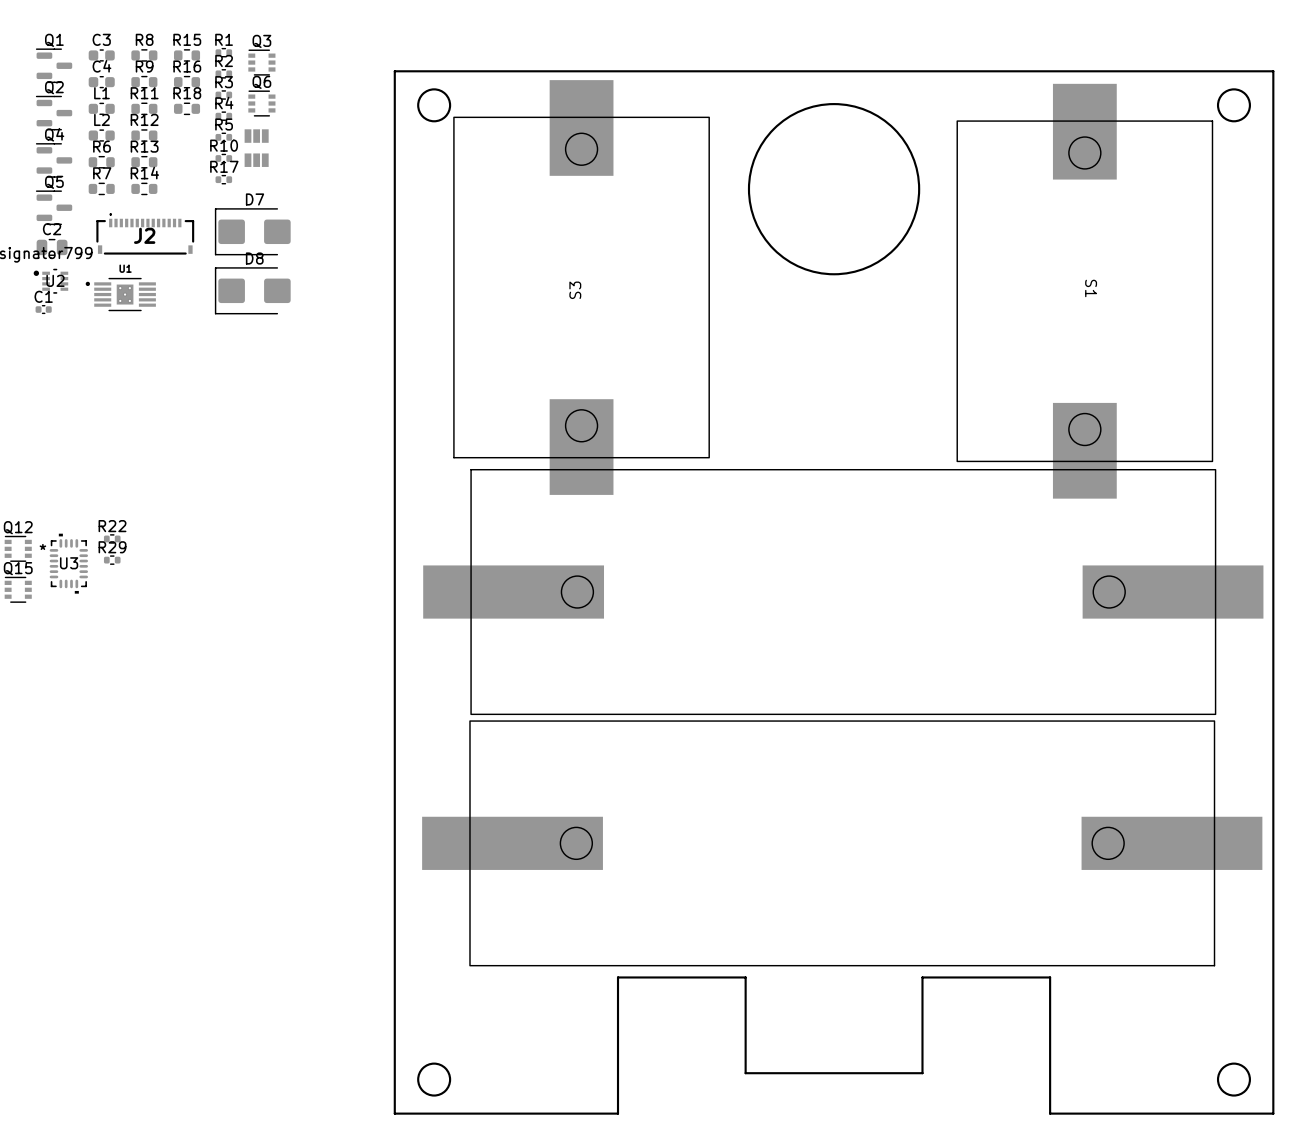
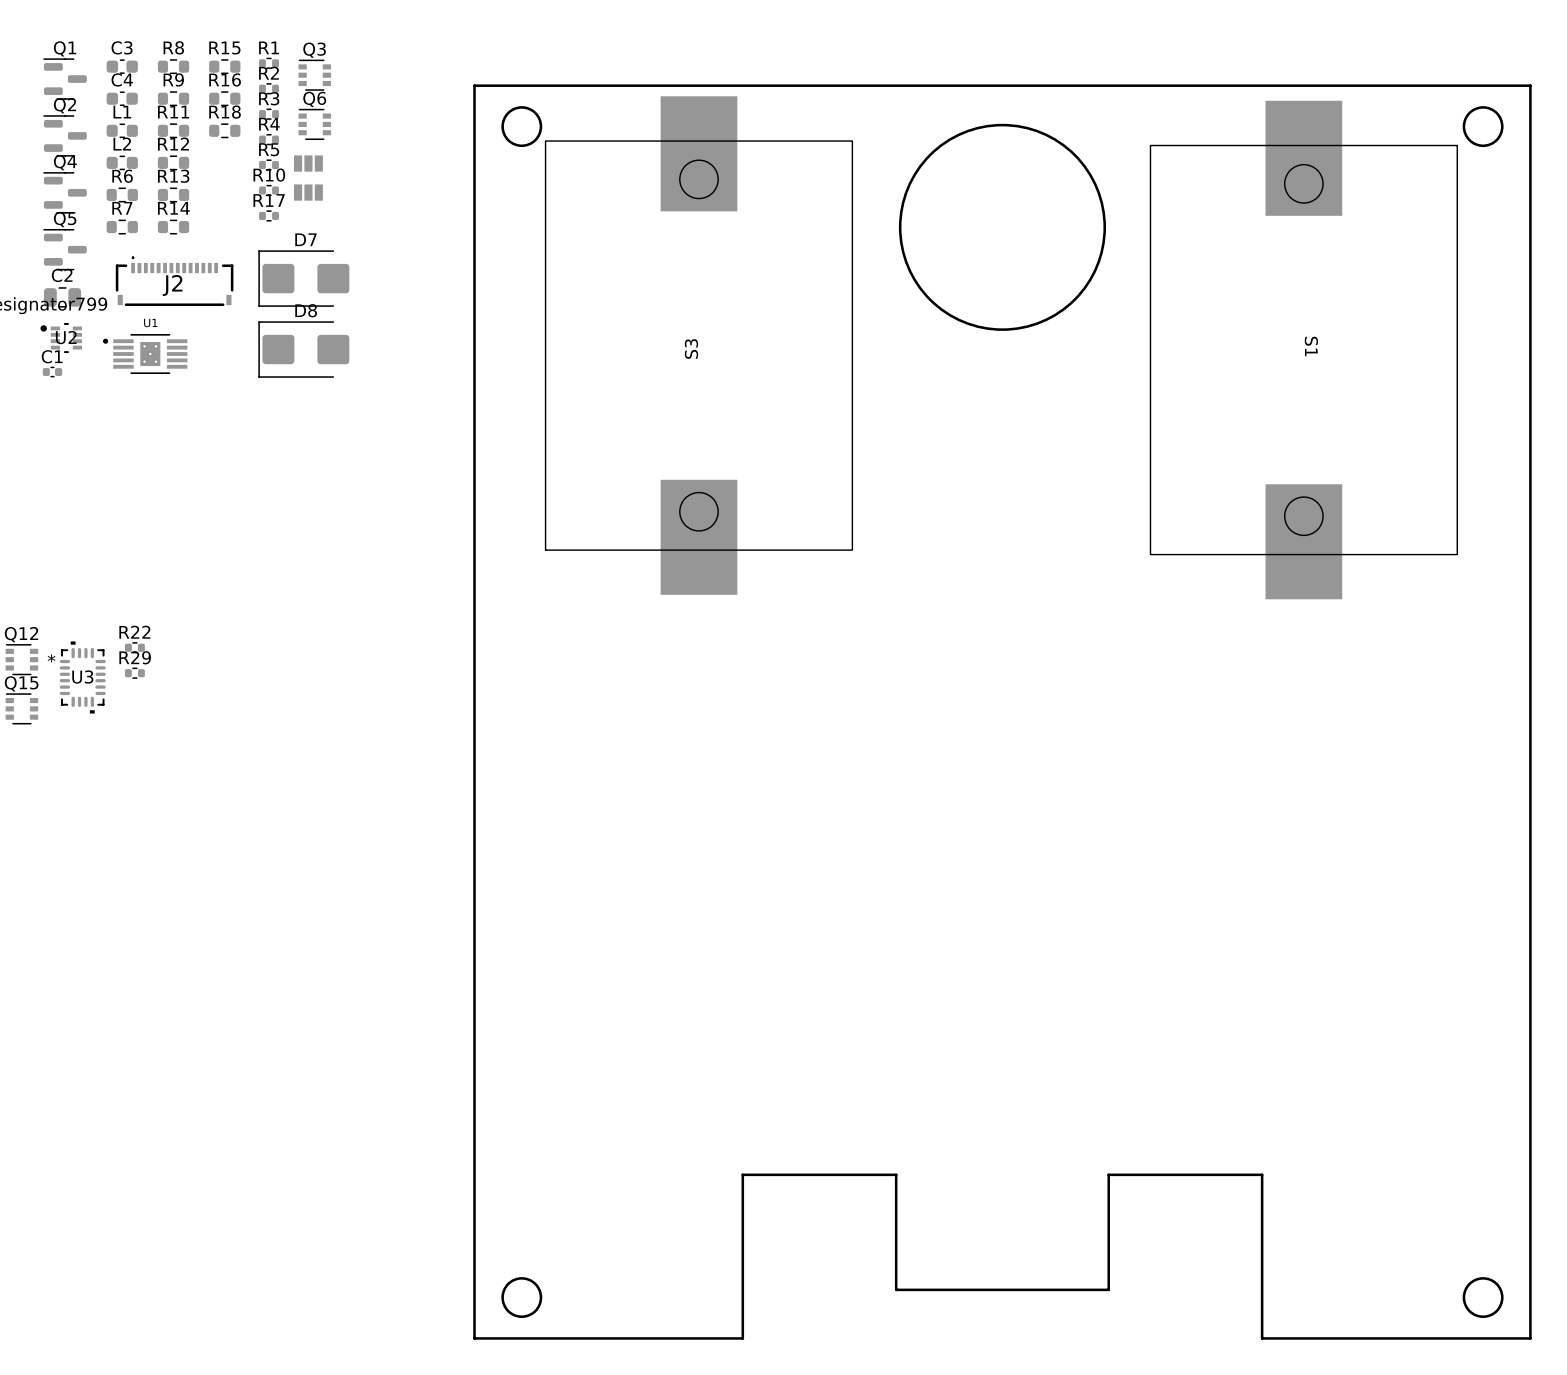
part: (843, 592) -> none
part: (842, 843) -> none

